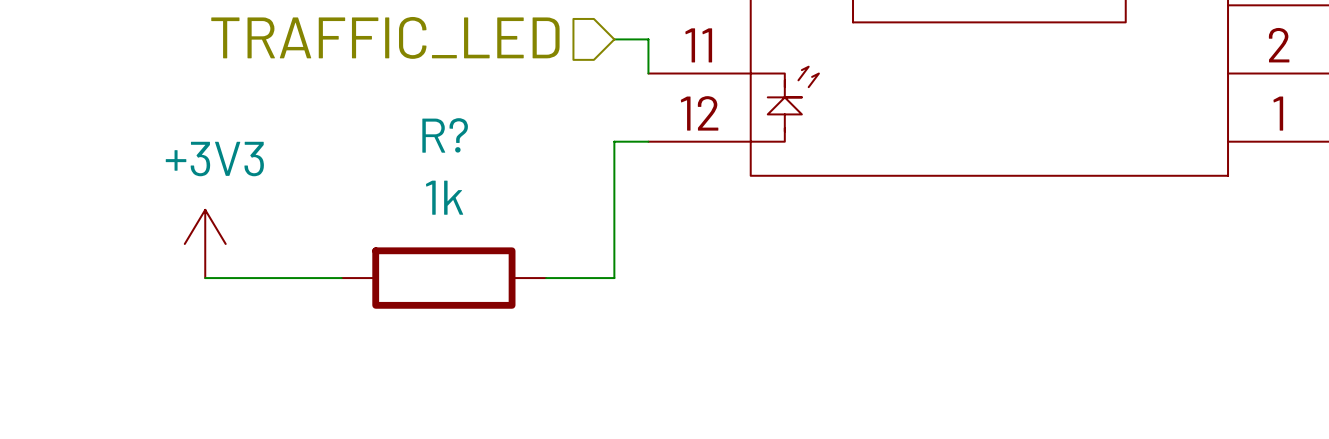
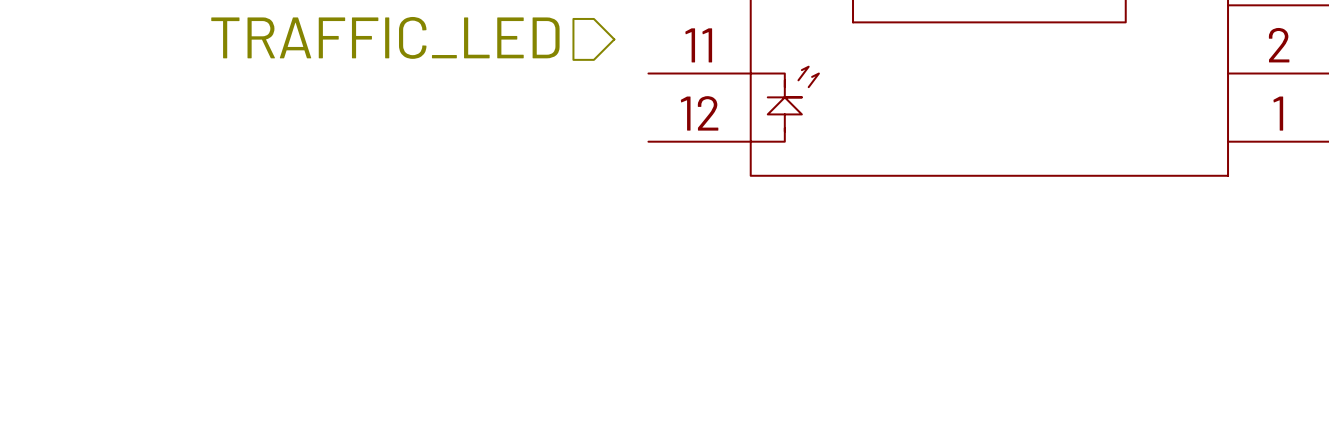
wire: (614, 39) (648, 39) (648, 73) -> none
wire: (648, 141) (614, 141) (614, 278) (546, 278) -> none
power symbol: +3V3 (205, 243) -> none
wire: (205, 278) (341, 278) -> none
R?: 1k (443, 278) -> none

